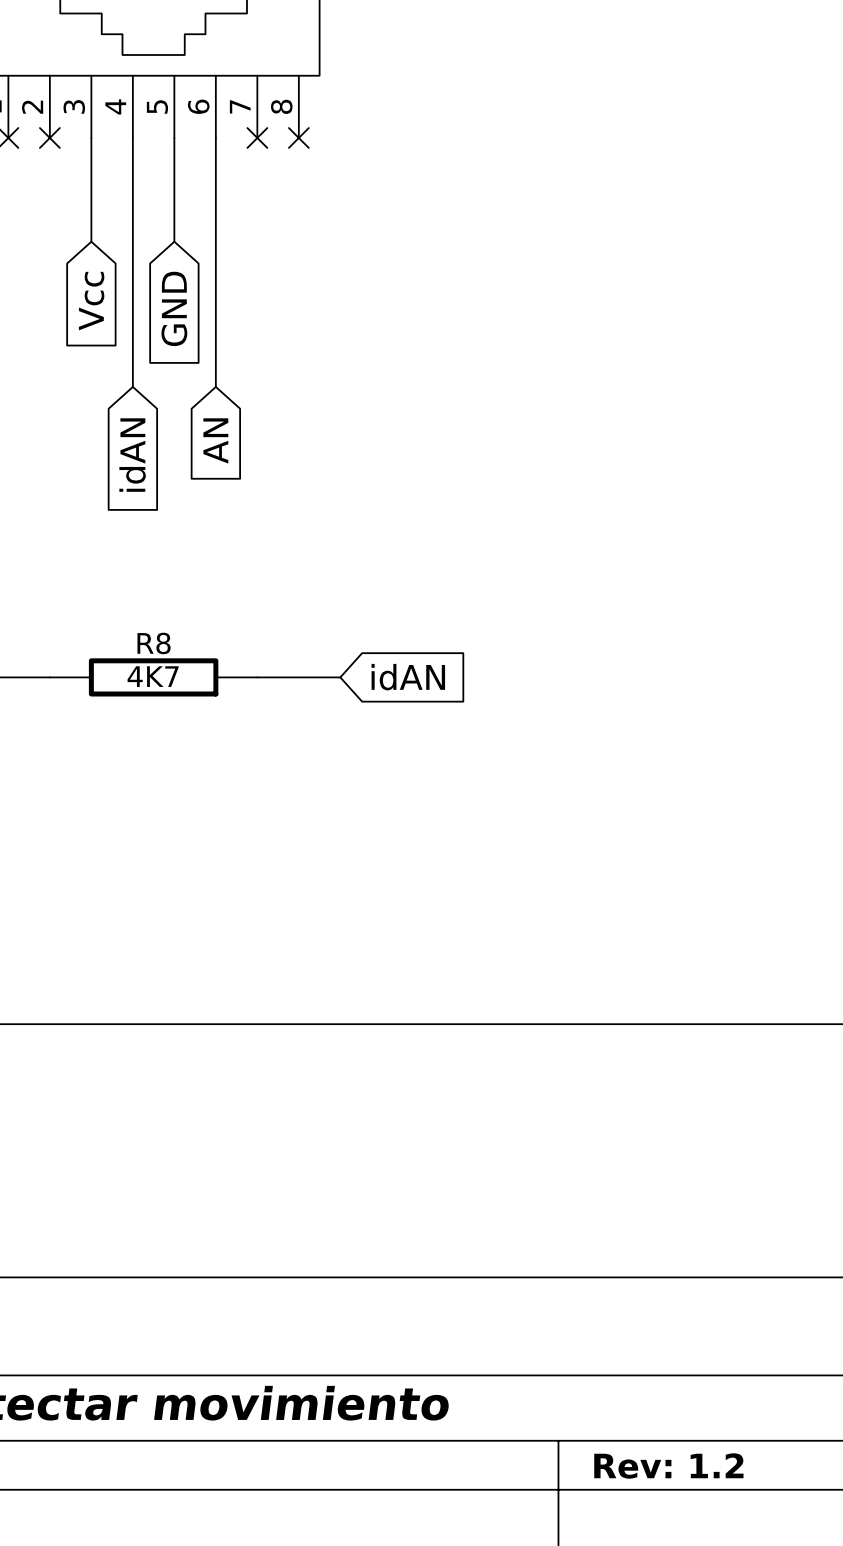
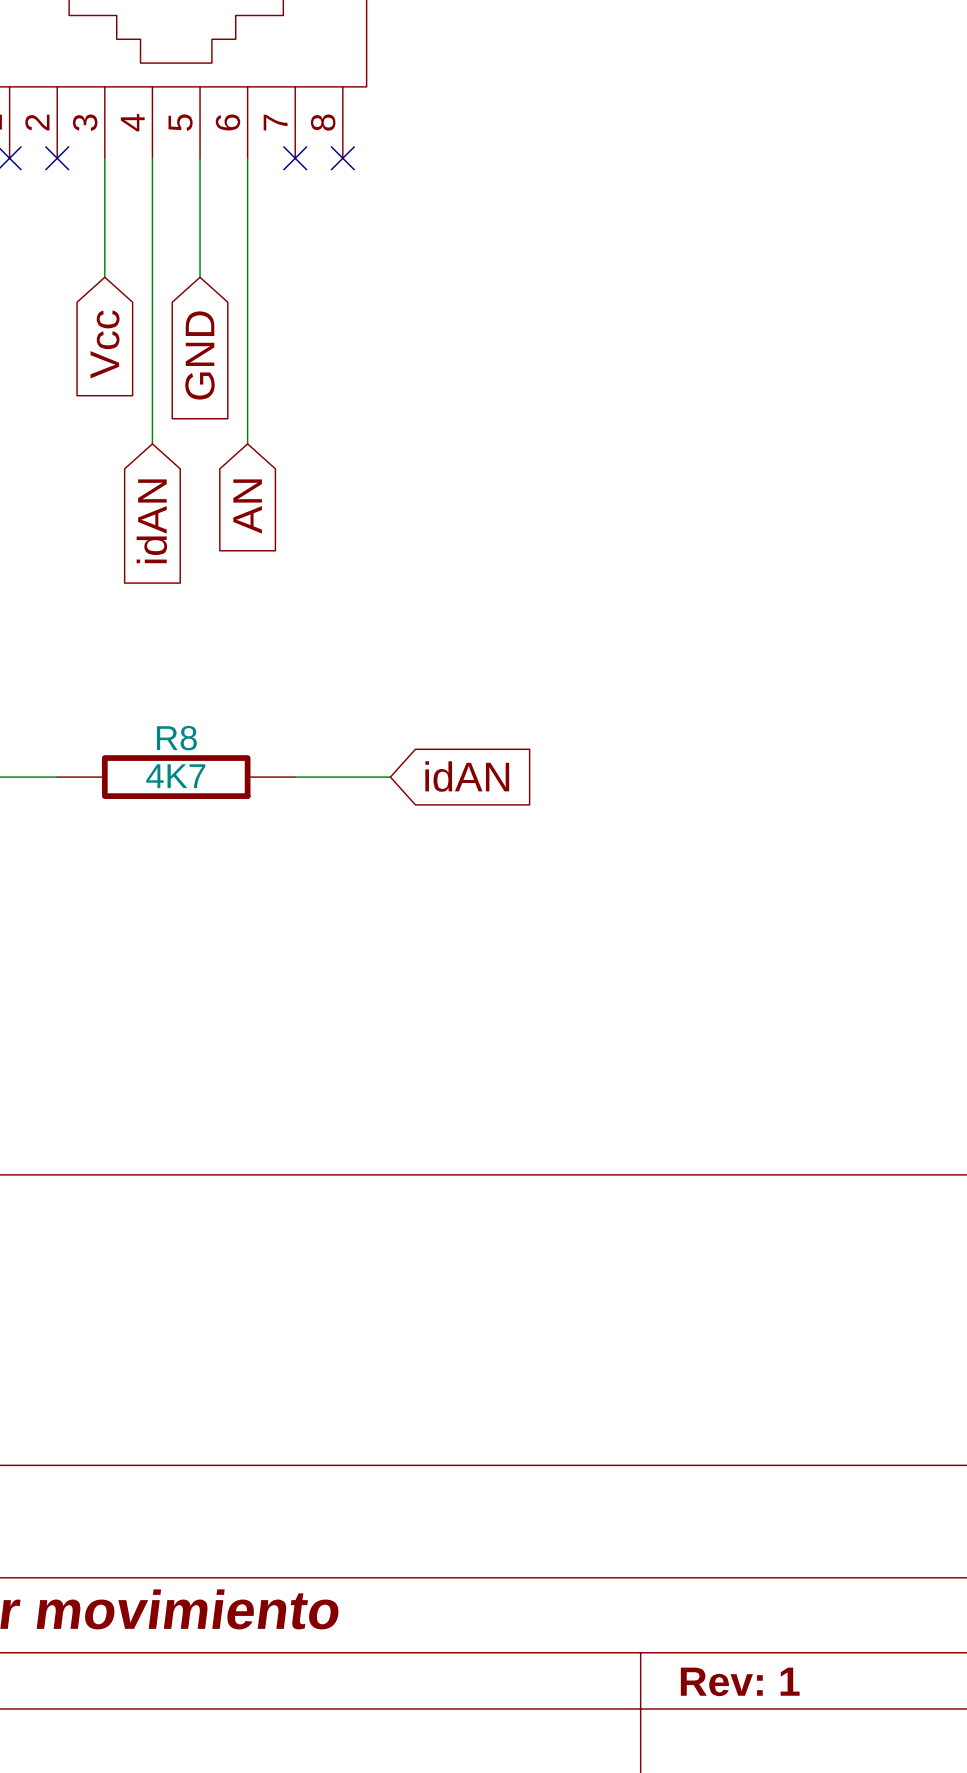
title block: Rev: 1.2 (668, 1466) -> Rev: 1 (740, 1681)

